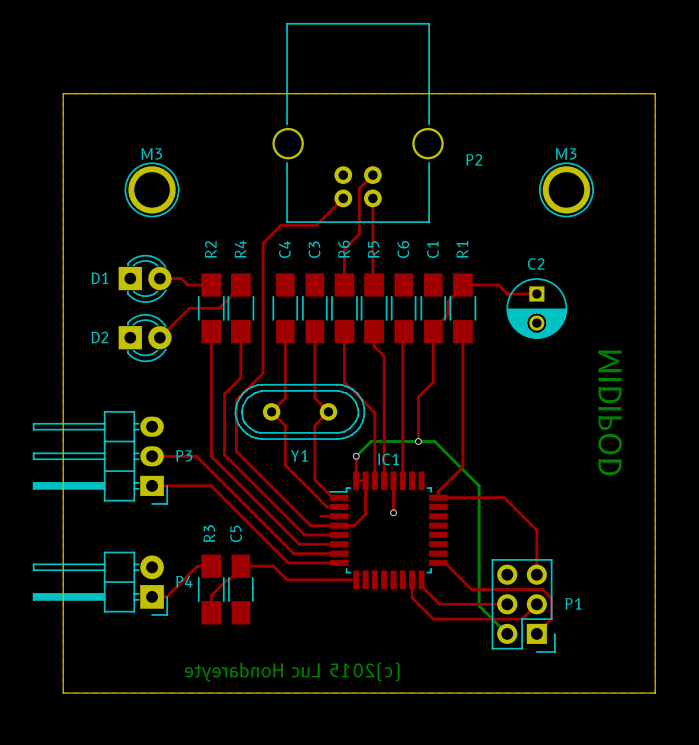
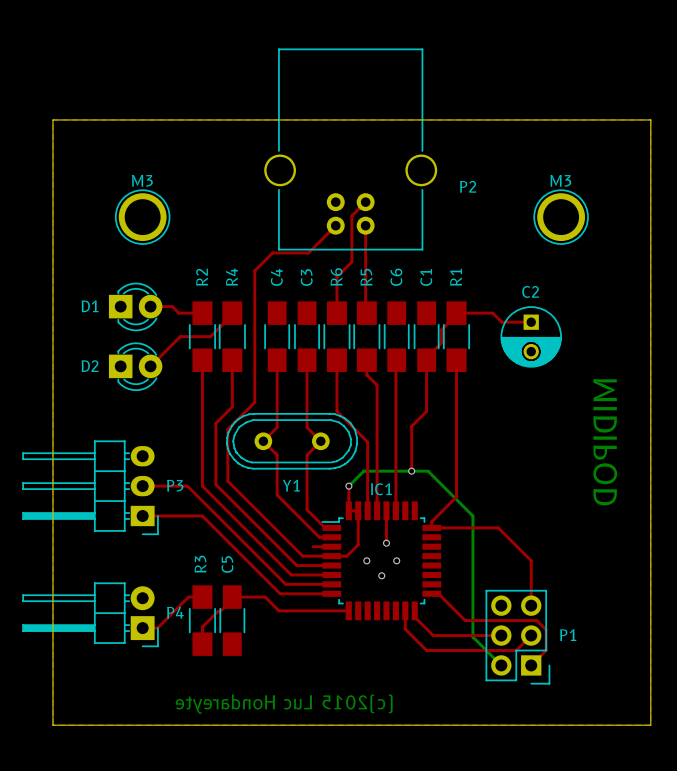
via: none -> (366, 560)
via: none -> (396, 560)
via: none -> (381, 575)

